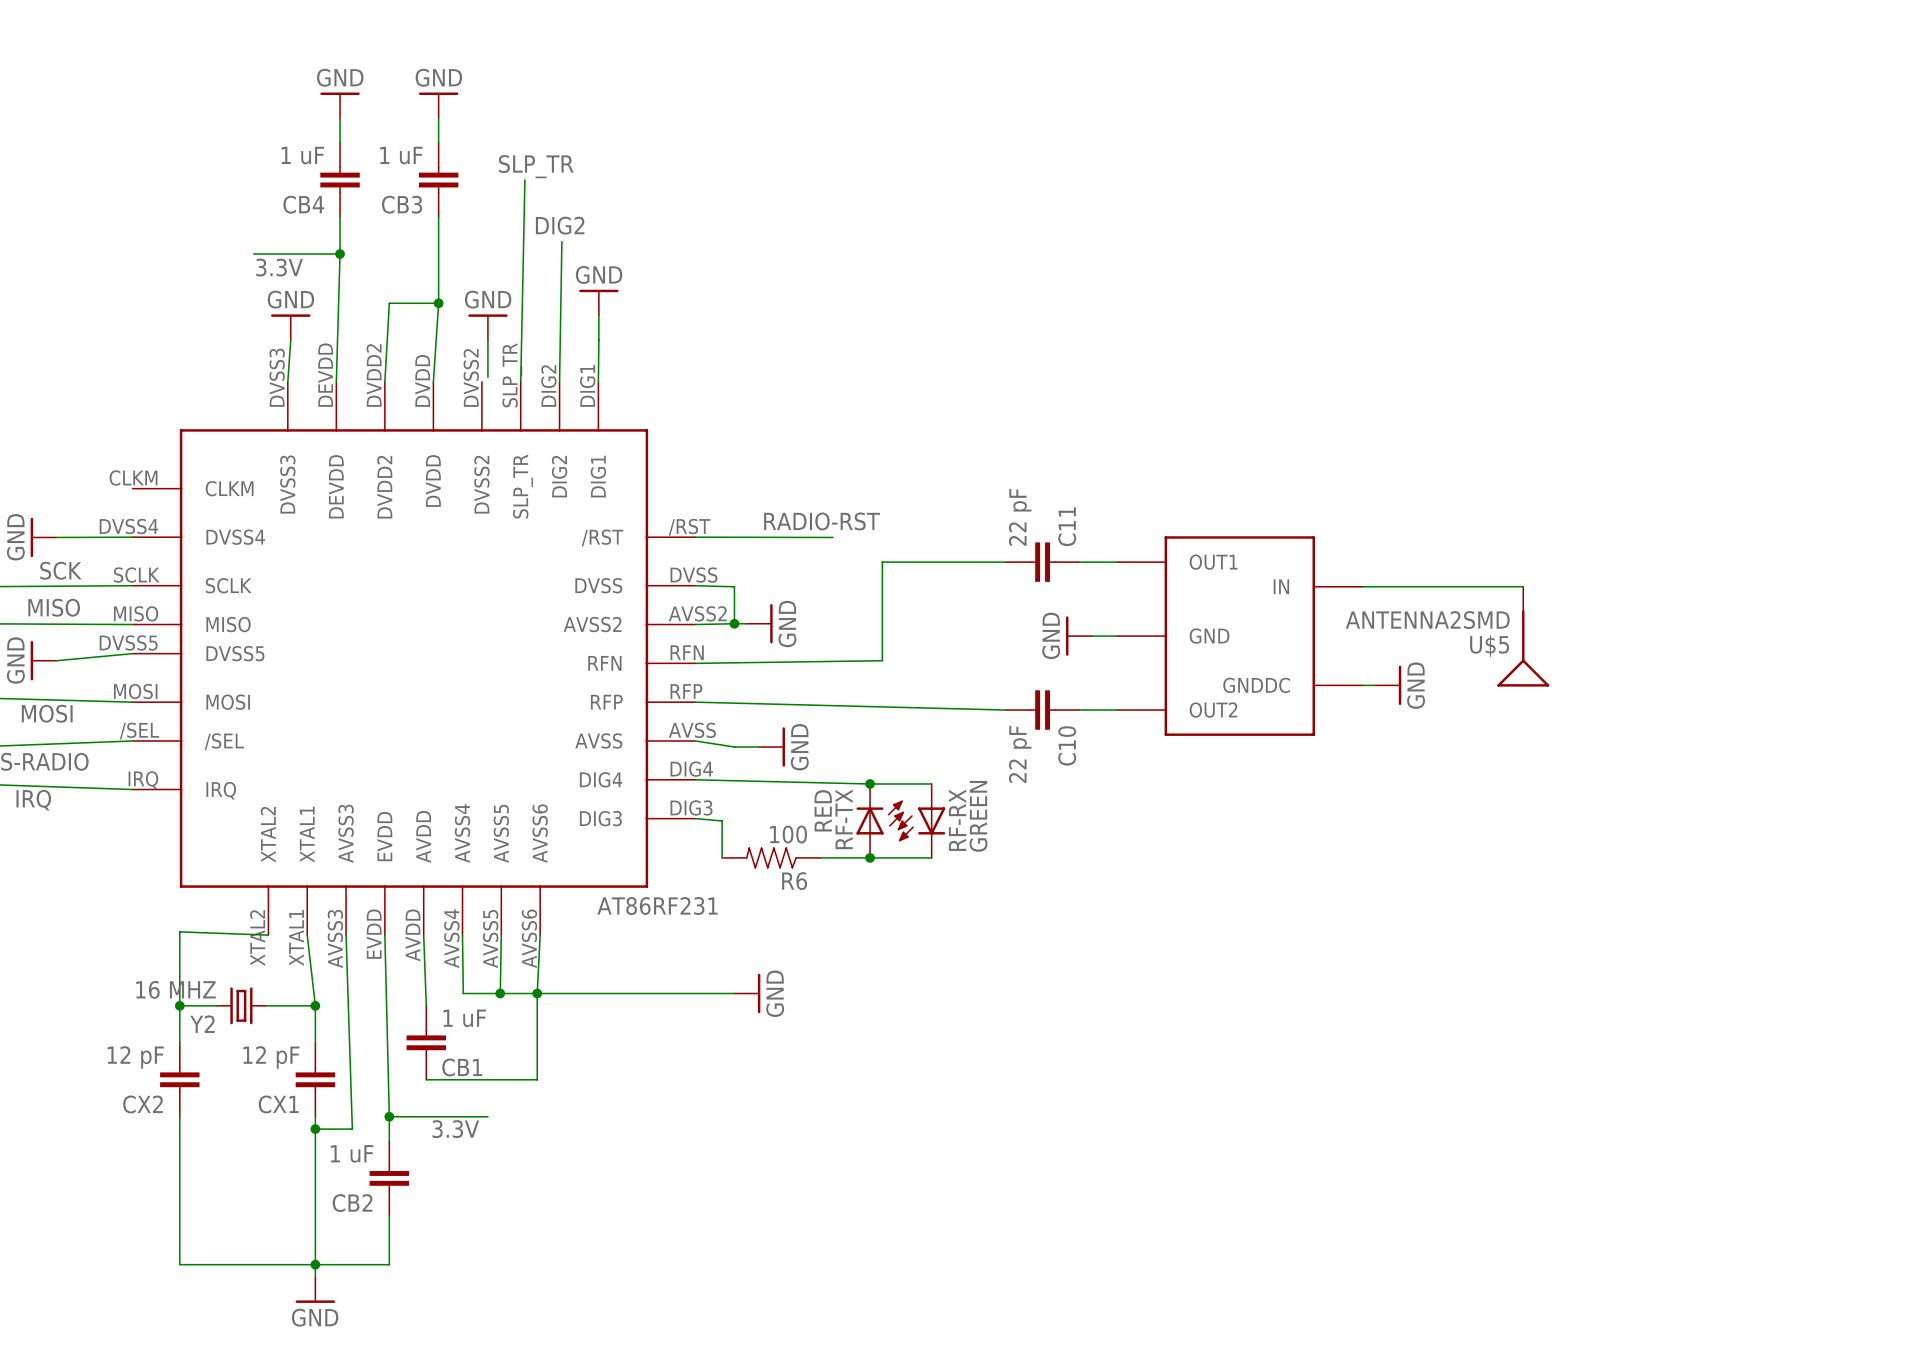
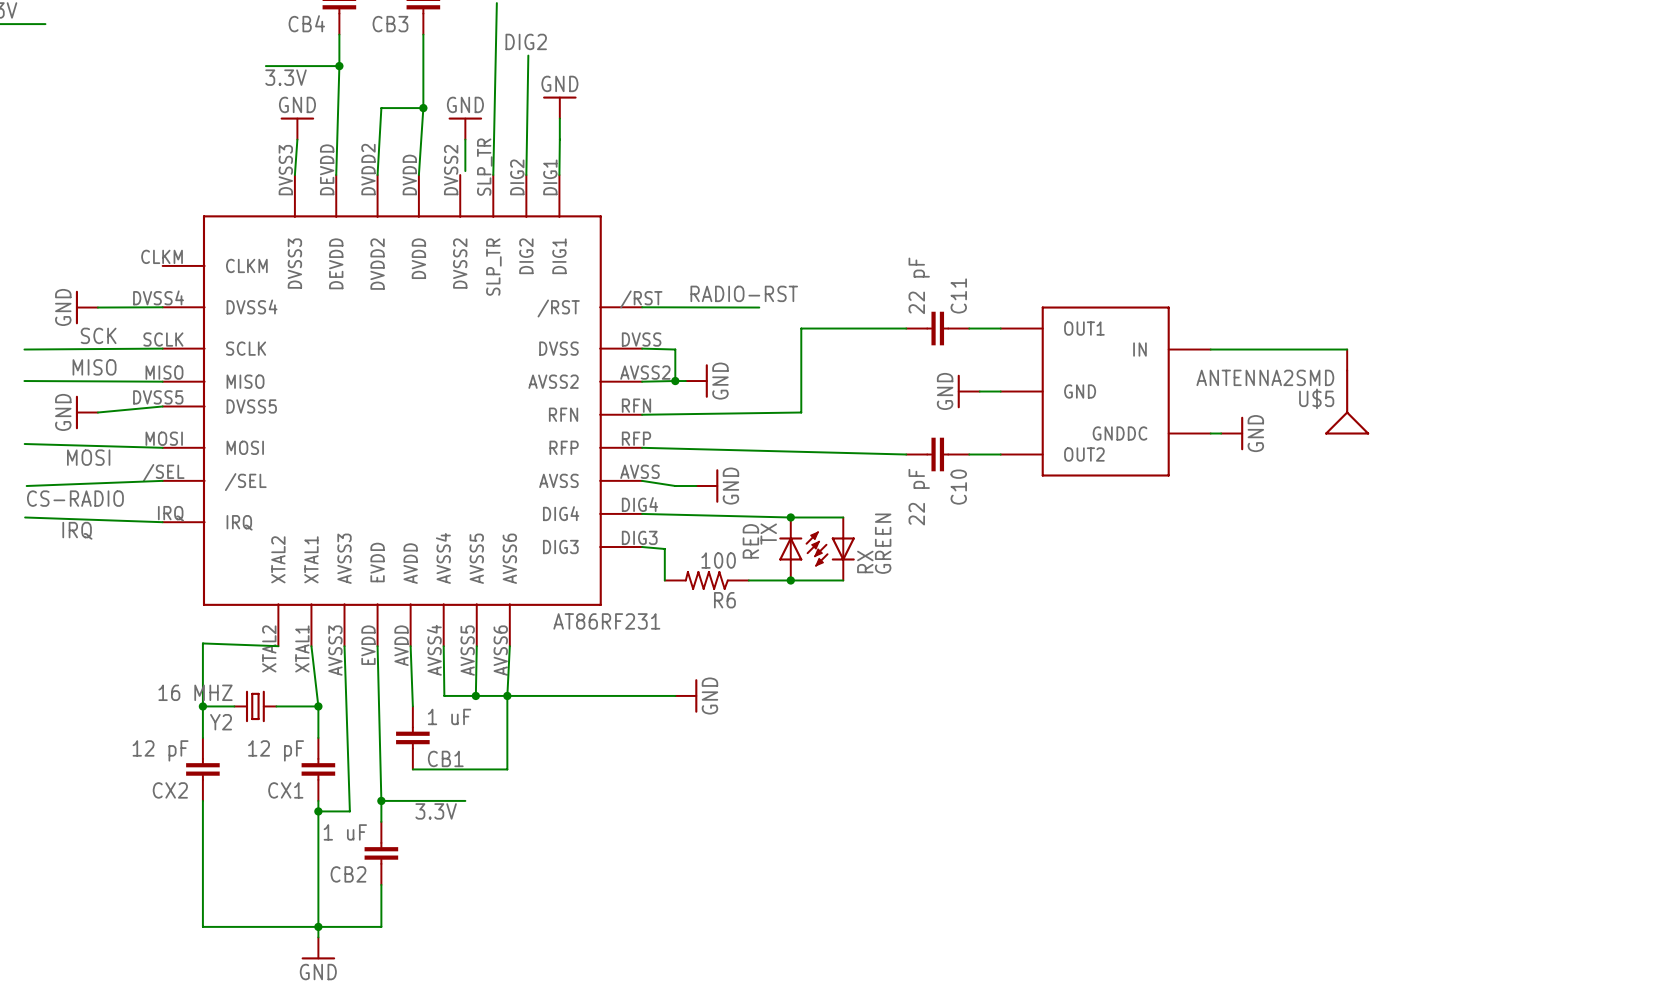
RF-TX name: RF-TX (844, 819) -> TX (768, 534)
RF-RX name: RF-RX (957, 820) -> RX (865, 561)

